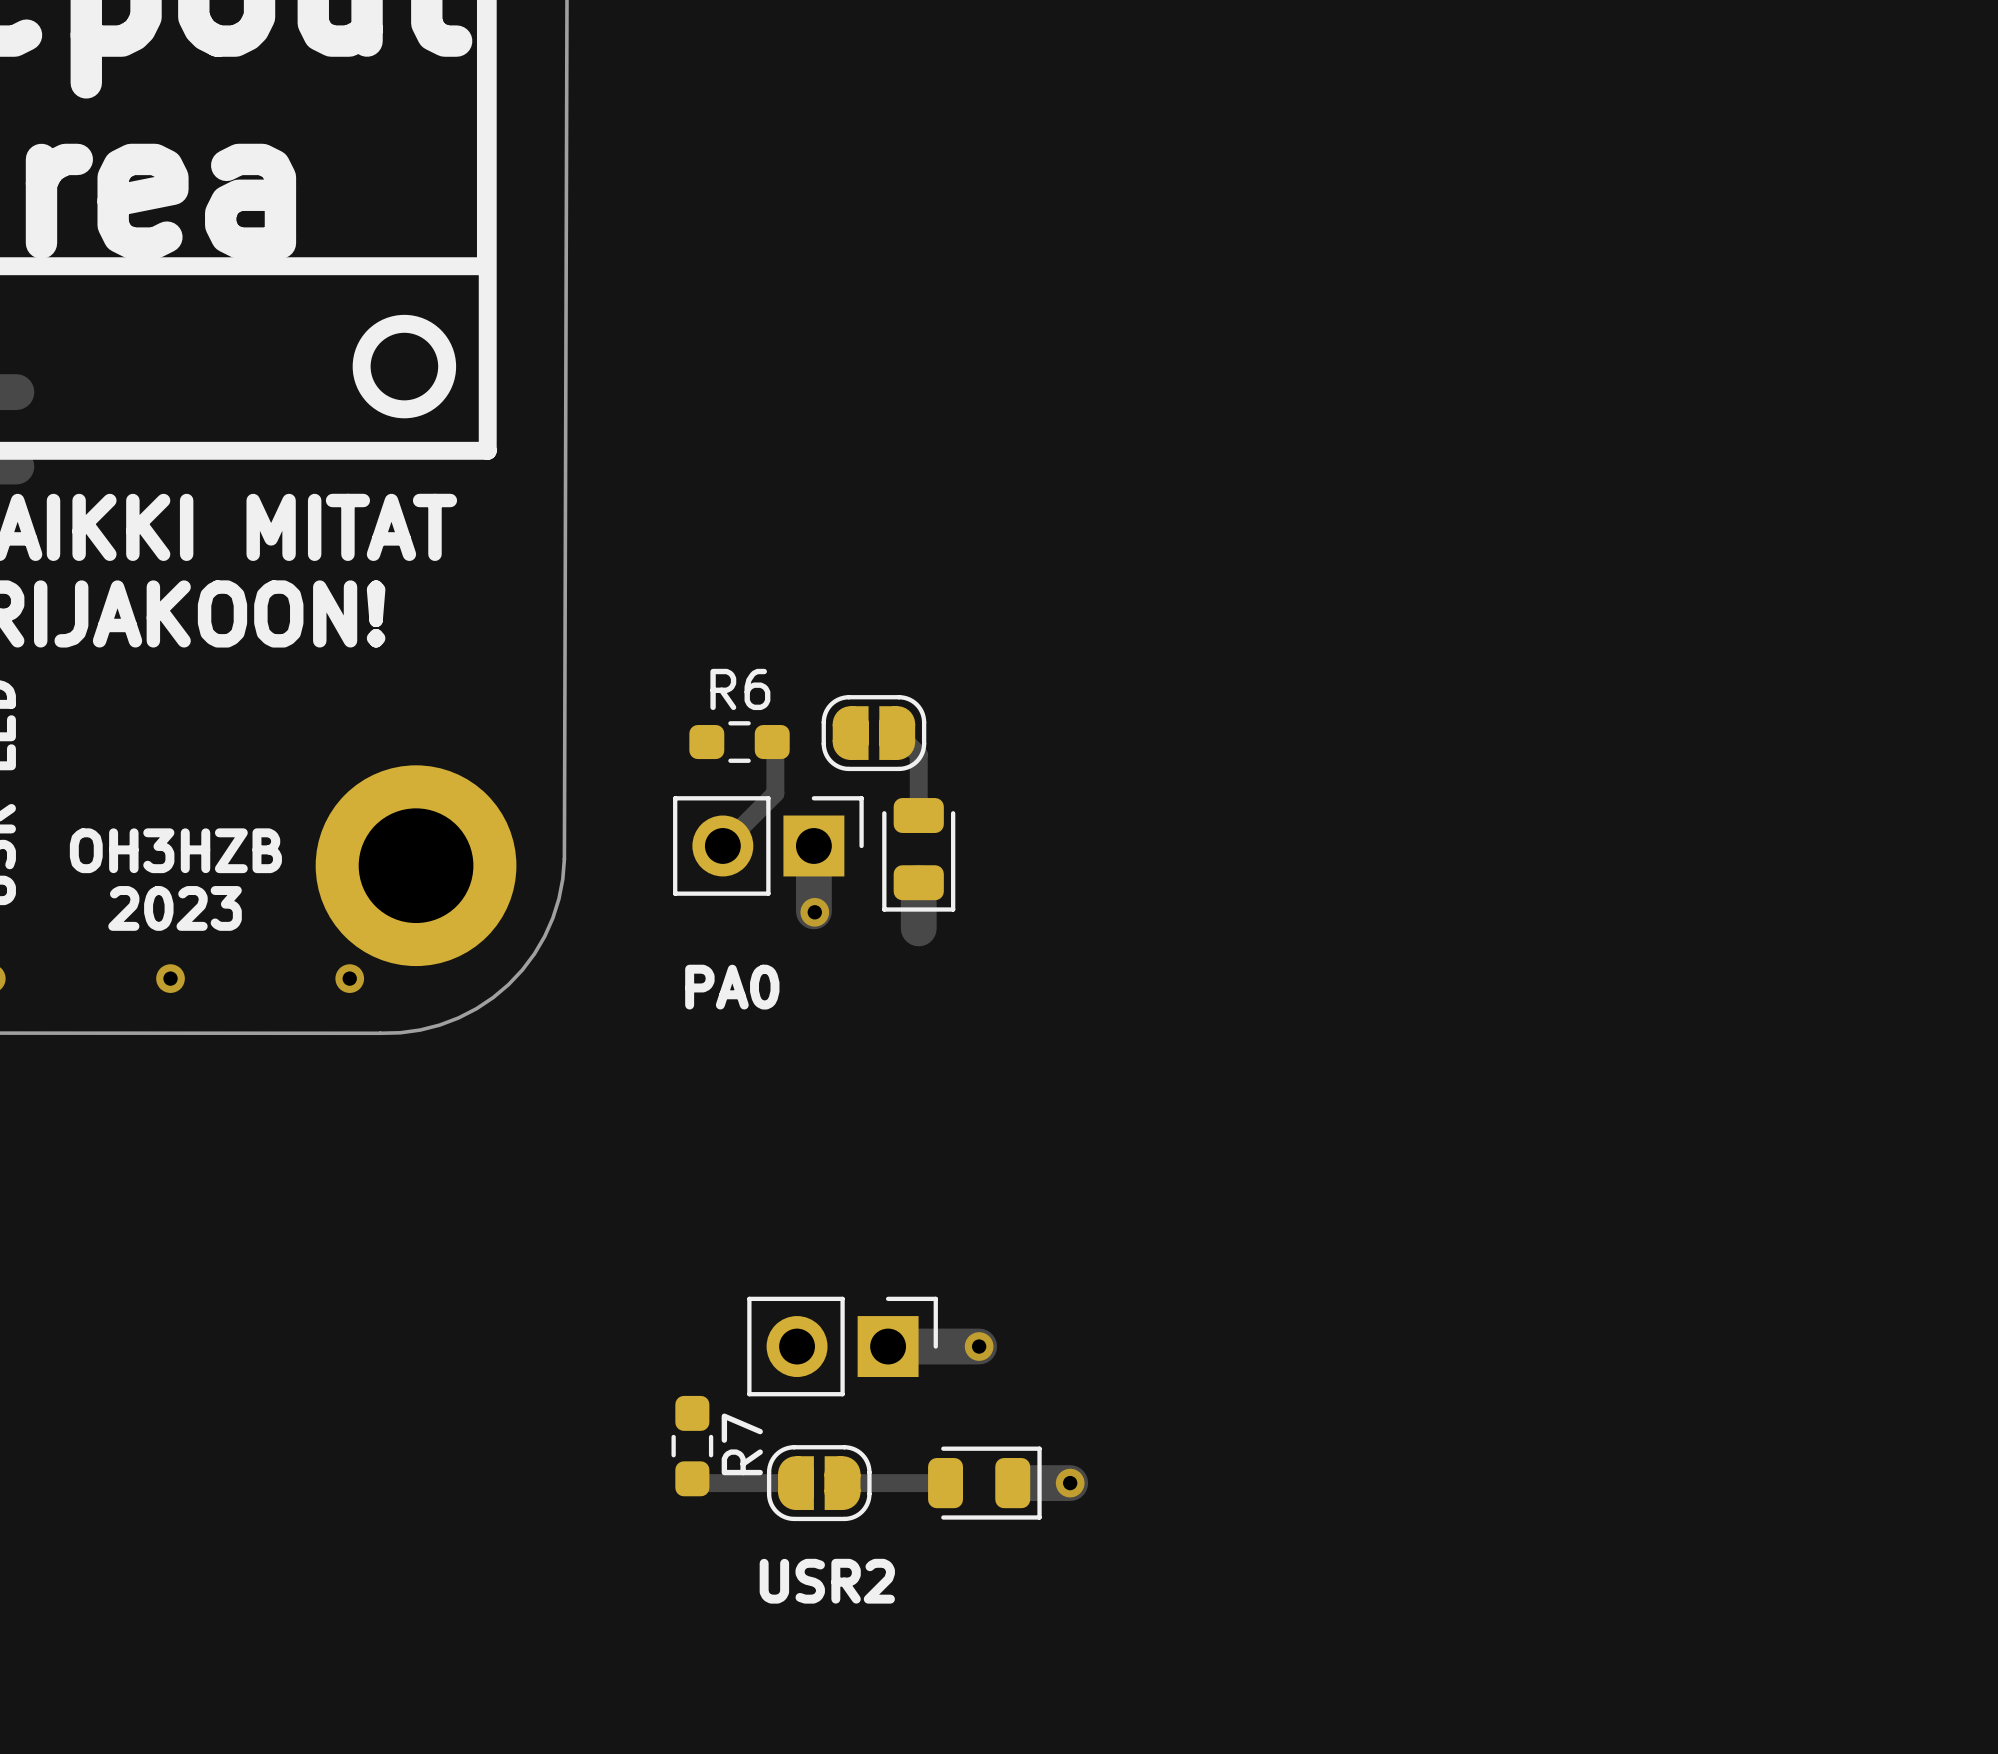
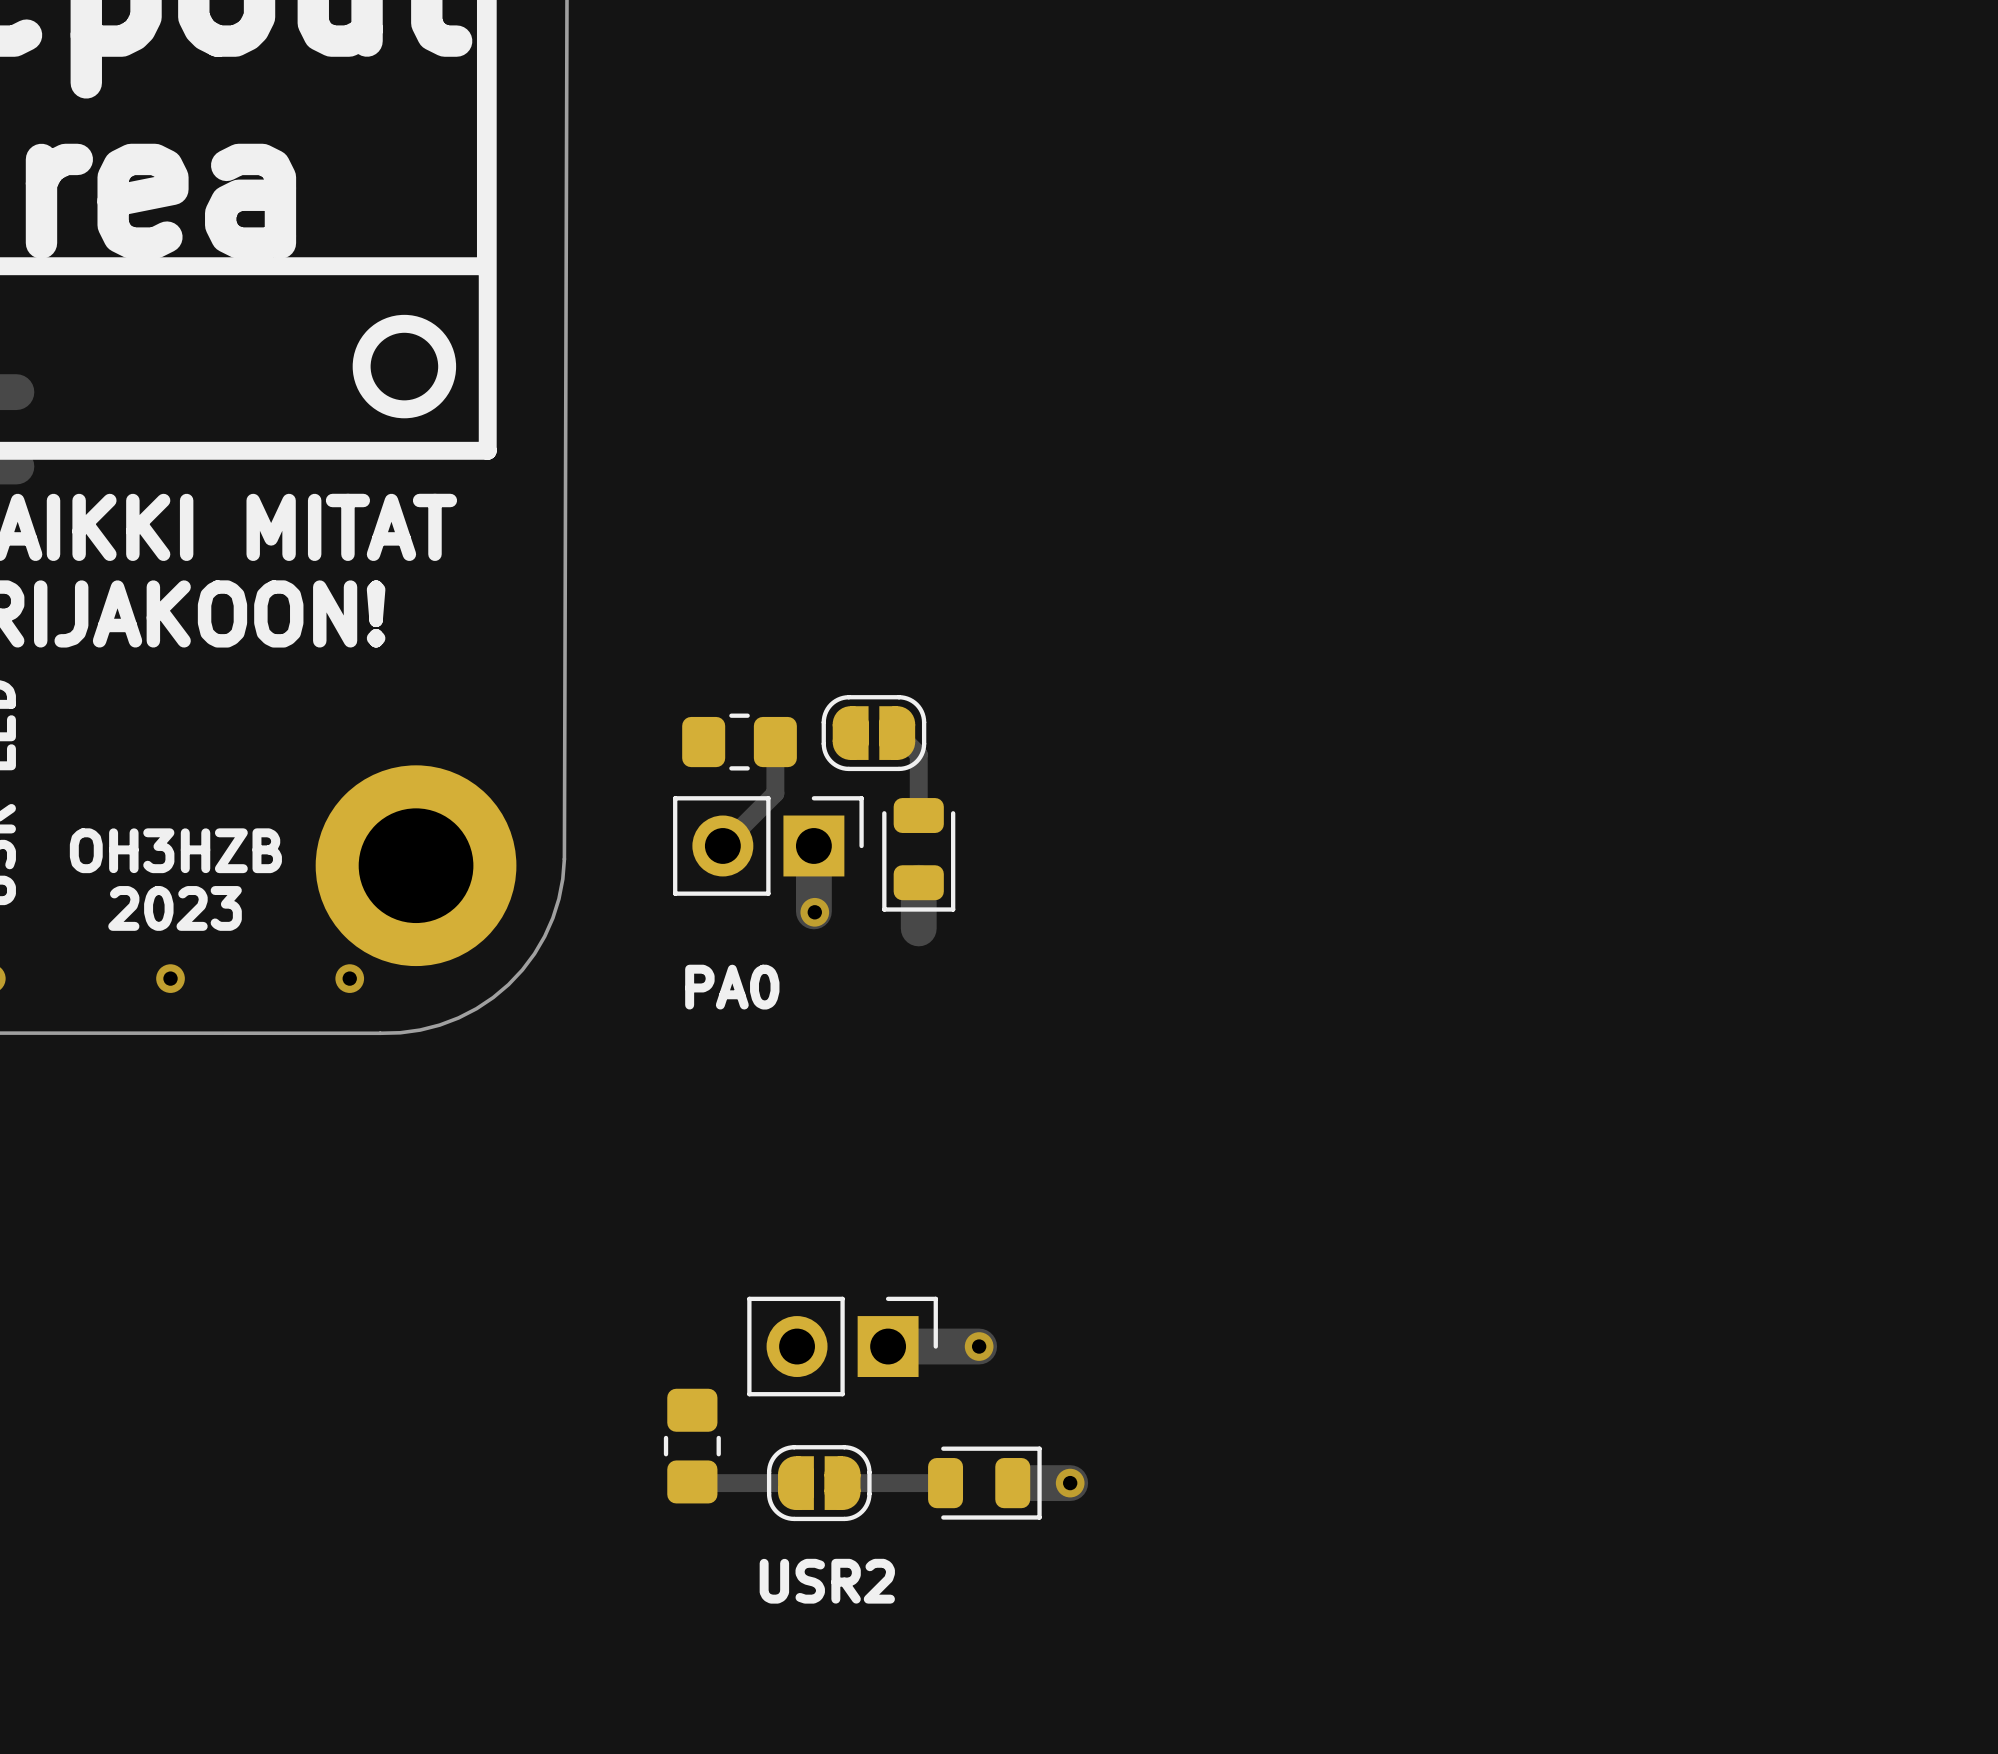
R6: (739, 742) -> none
part: none -> (739, 742)
R7: (692, 1446) -> none
part: none -> (692, 1446)

